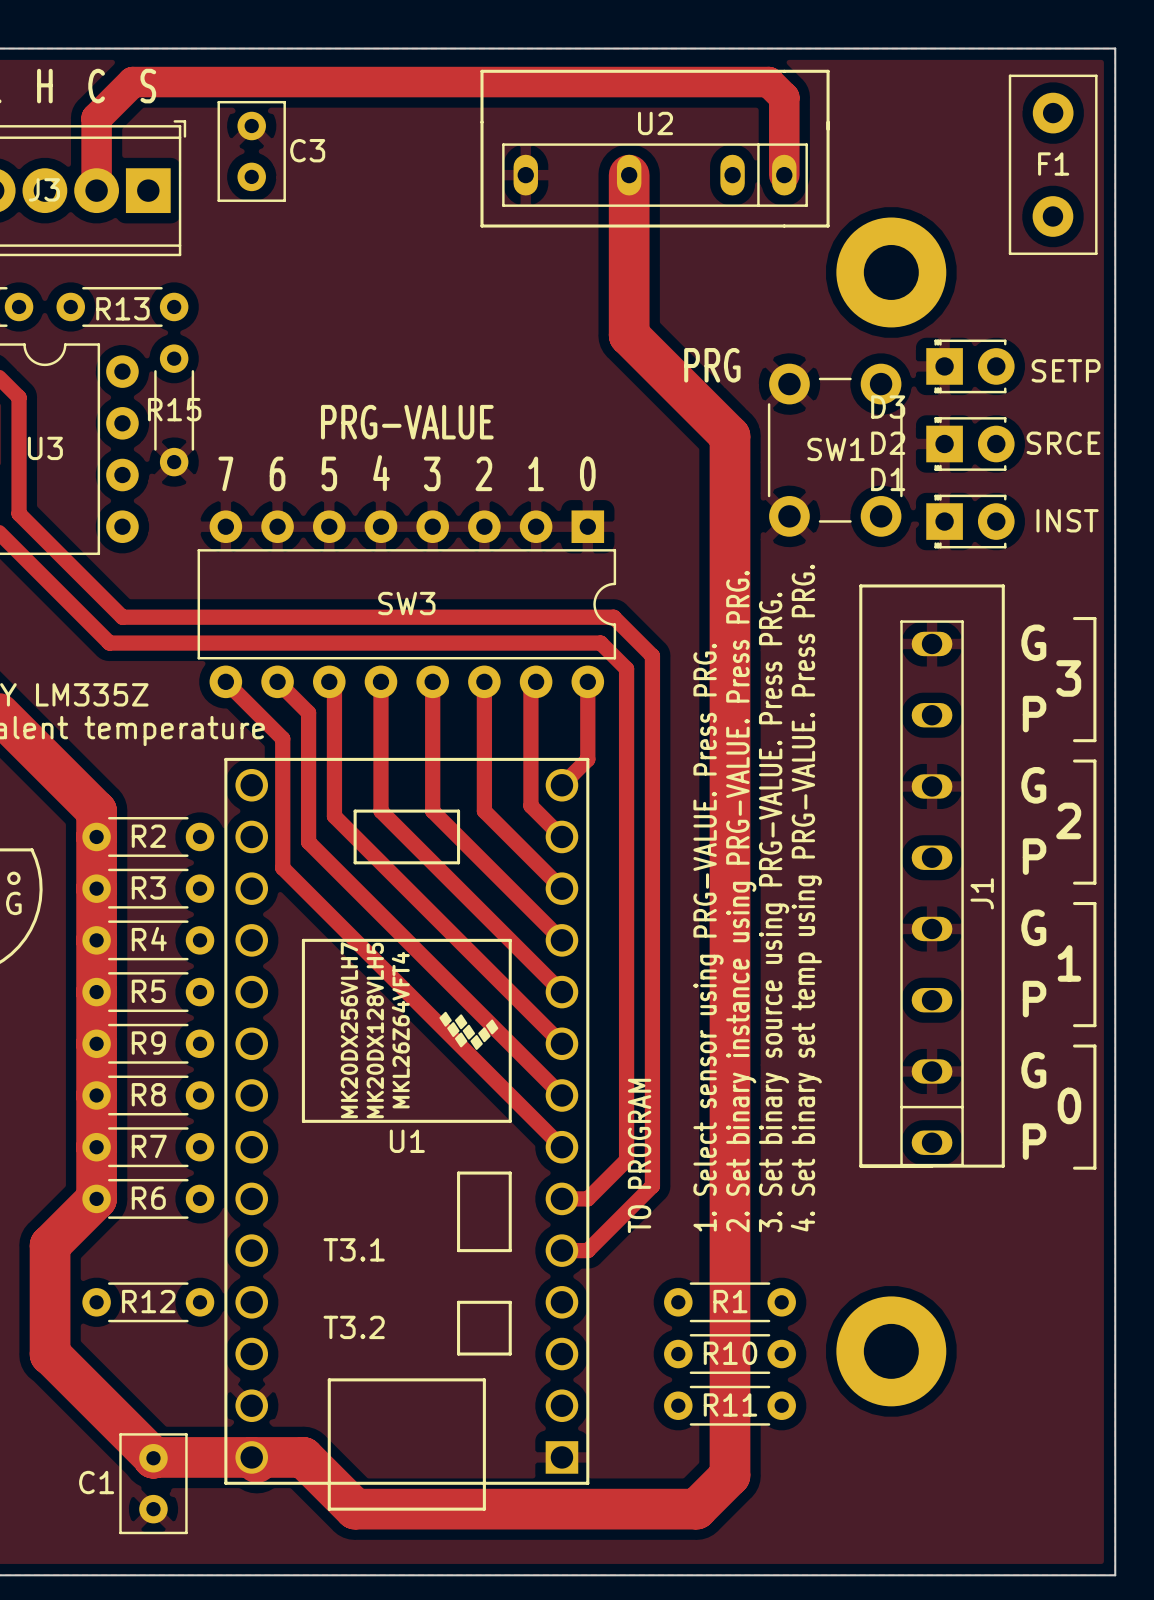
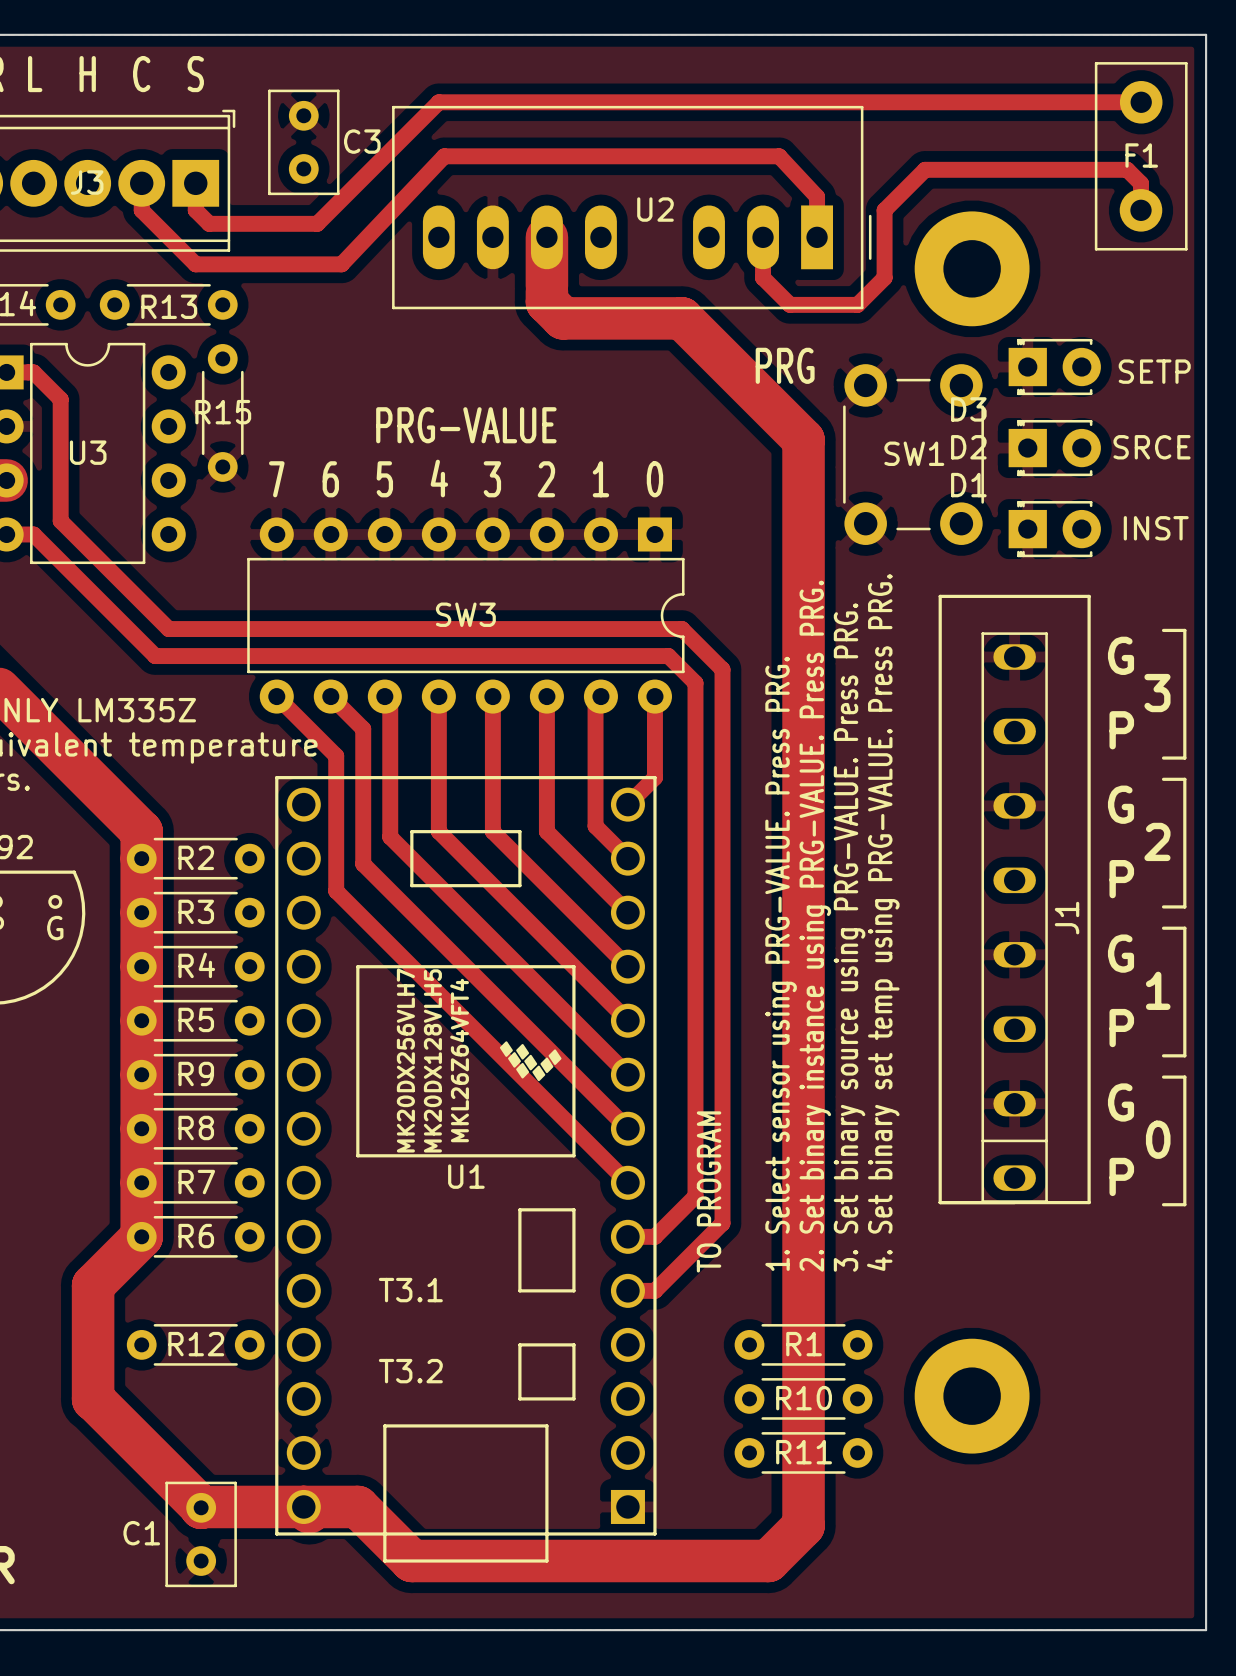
U2 footprint: [480, 69, 830, 228] -> [392, 105, 872, 310]
track: none -> (1141, 102) (438, 102) (317, 223) (209, 223) (195, 210) (195, 183)
track: (629, 175) (629, 335) -> (546, 237) (546, 302) (563, 318) (681, 318) (698, 334)
track: (784, 175) (784, 97) (768, 82) (132, 82) (96, 118) (96, 190) -> (817, 237) (817, 196) (779, 156) (444, 156) (341, 264) (195, 264) (141, 210) (141, 183)
track: none -> (1141, 210) (1141, 183) (1127, 169) (925, 169) (884, 210) (884, 277) (857, 304) (790, 304) (763, 277) (763, 237)

